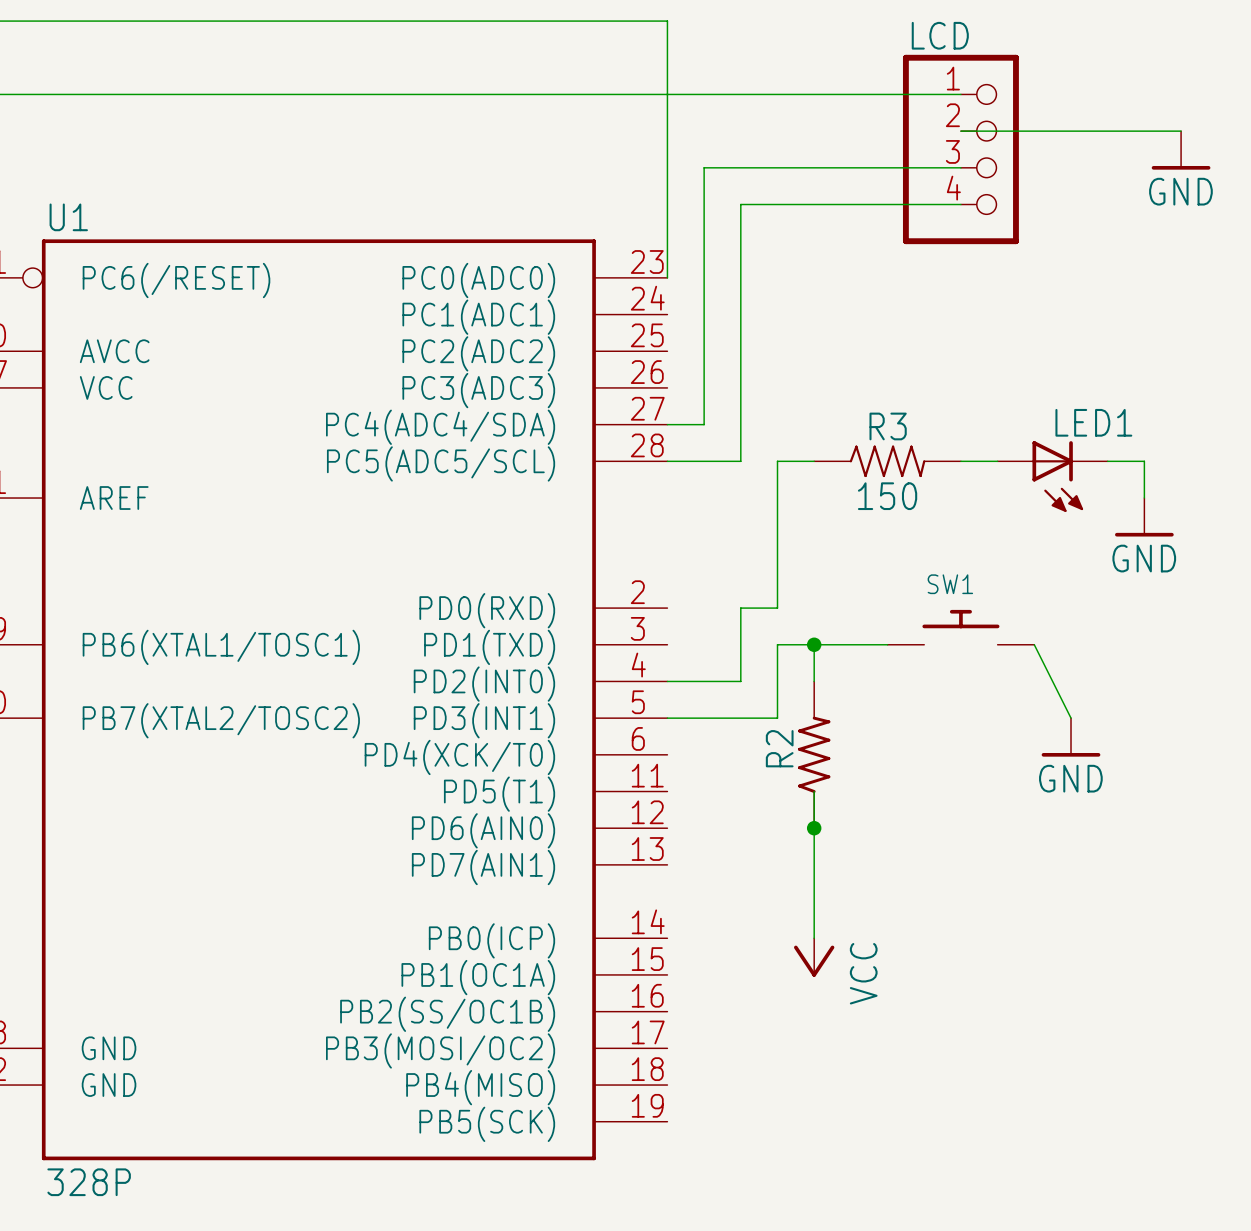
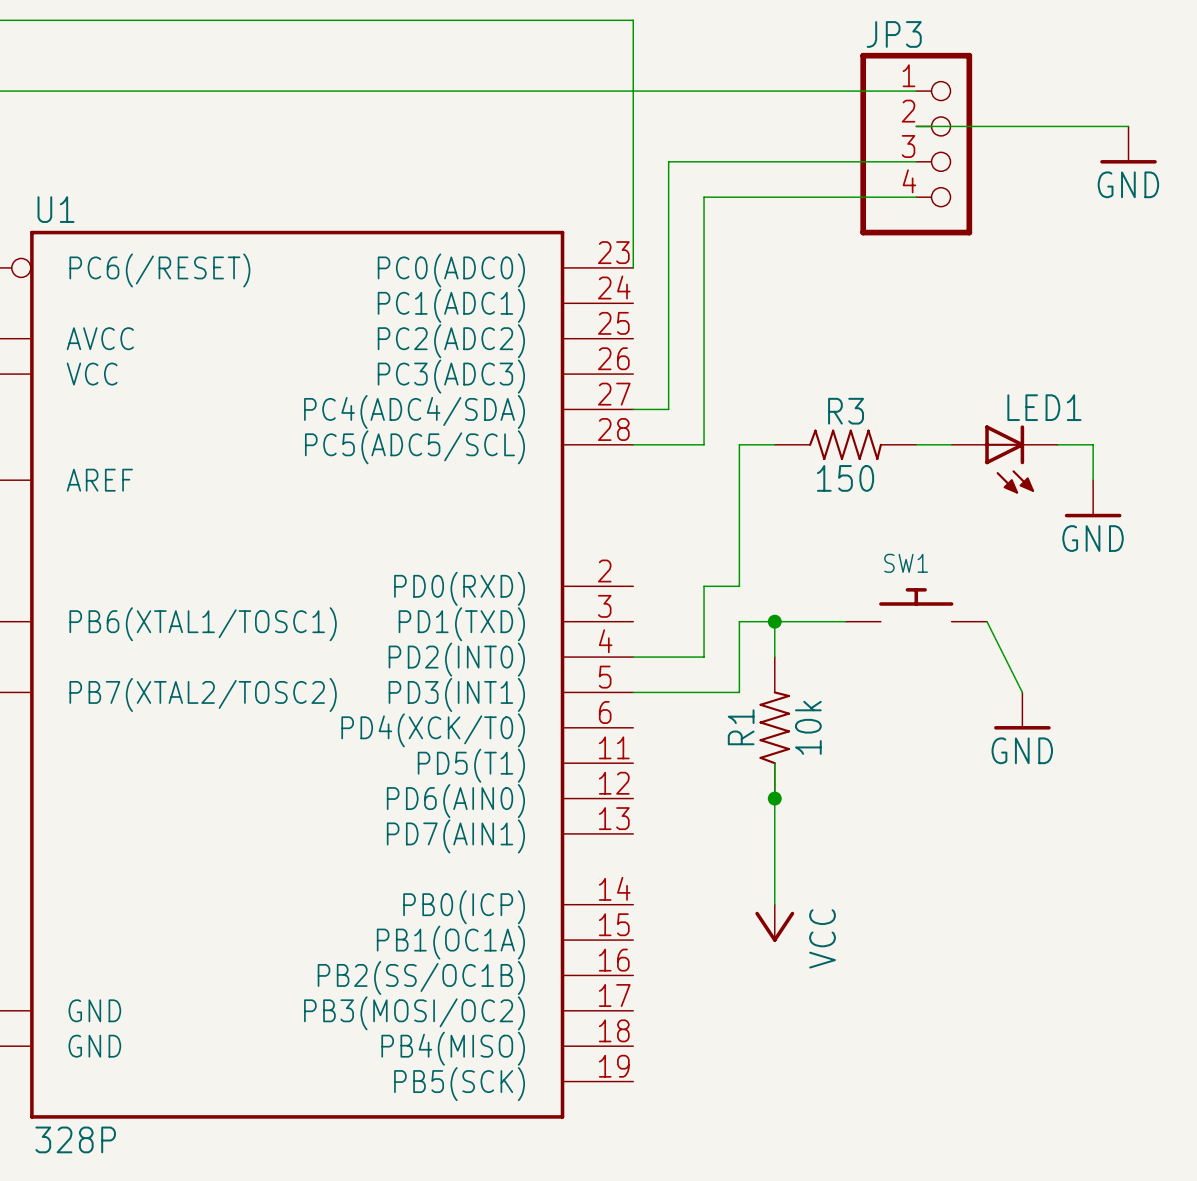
LCD name: LCD (940, 35) -> JP3 (894, 34)
R2: (814, 754) -> none
R1: none -> 10k (774, 727)

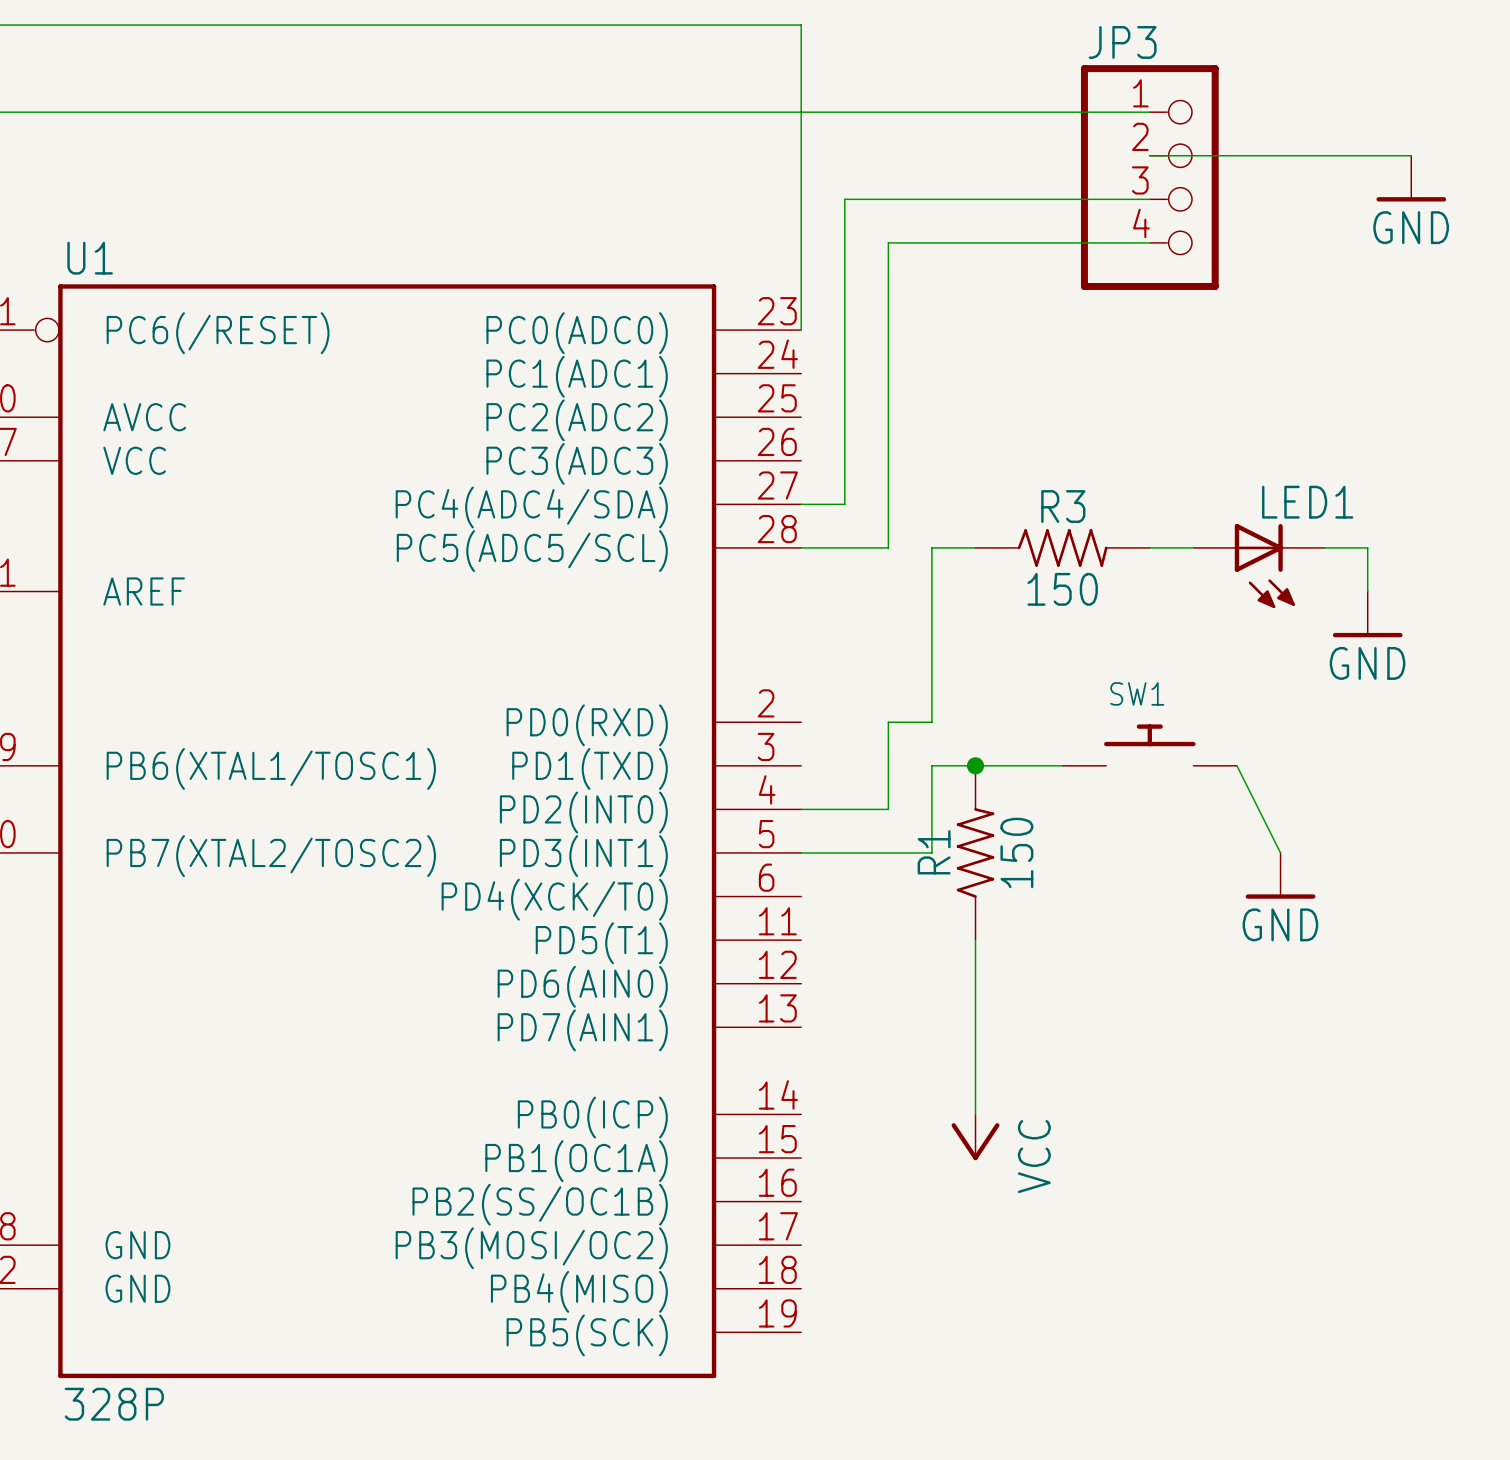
R1 position: (774, 727) -> (975, 852)
R1 value: 10k (808, 727) -> 150 (1016, 852)
junction: (774, 798) -> none

